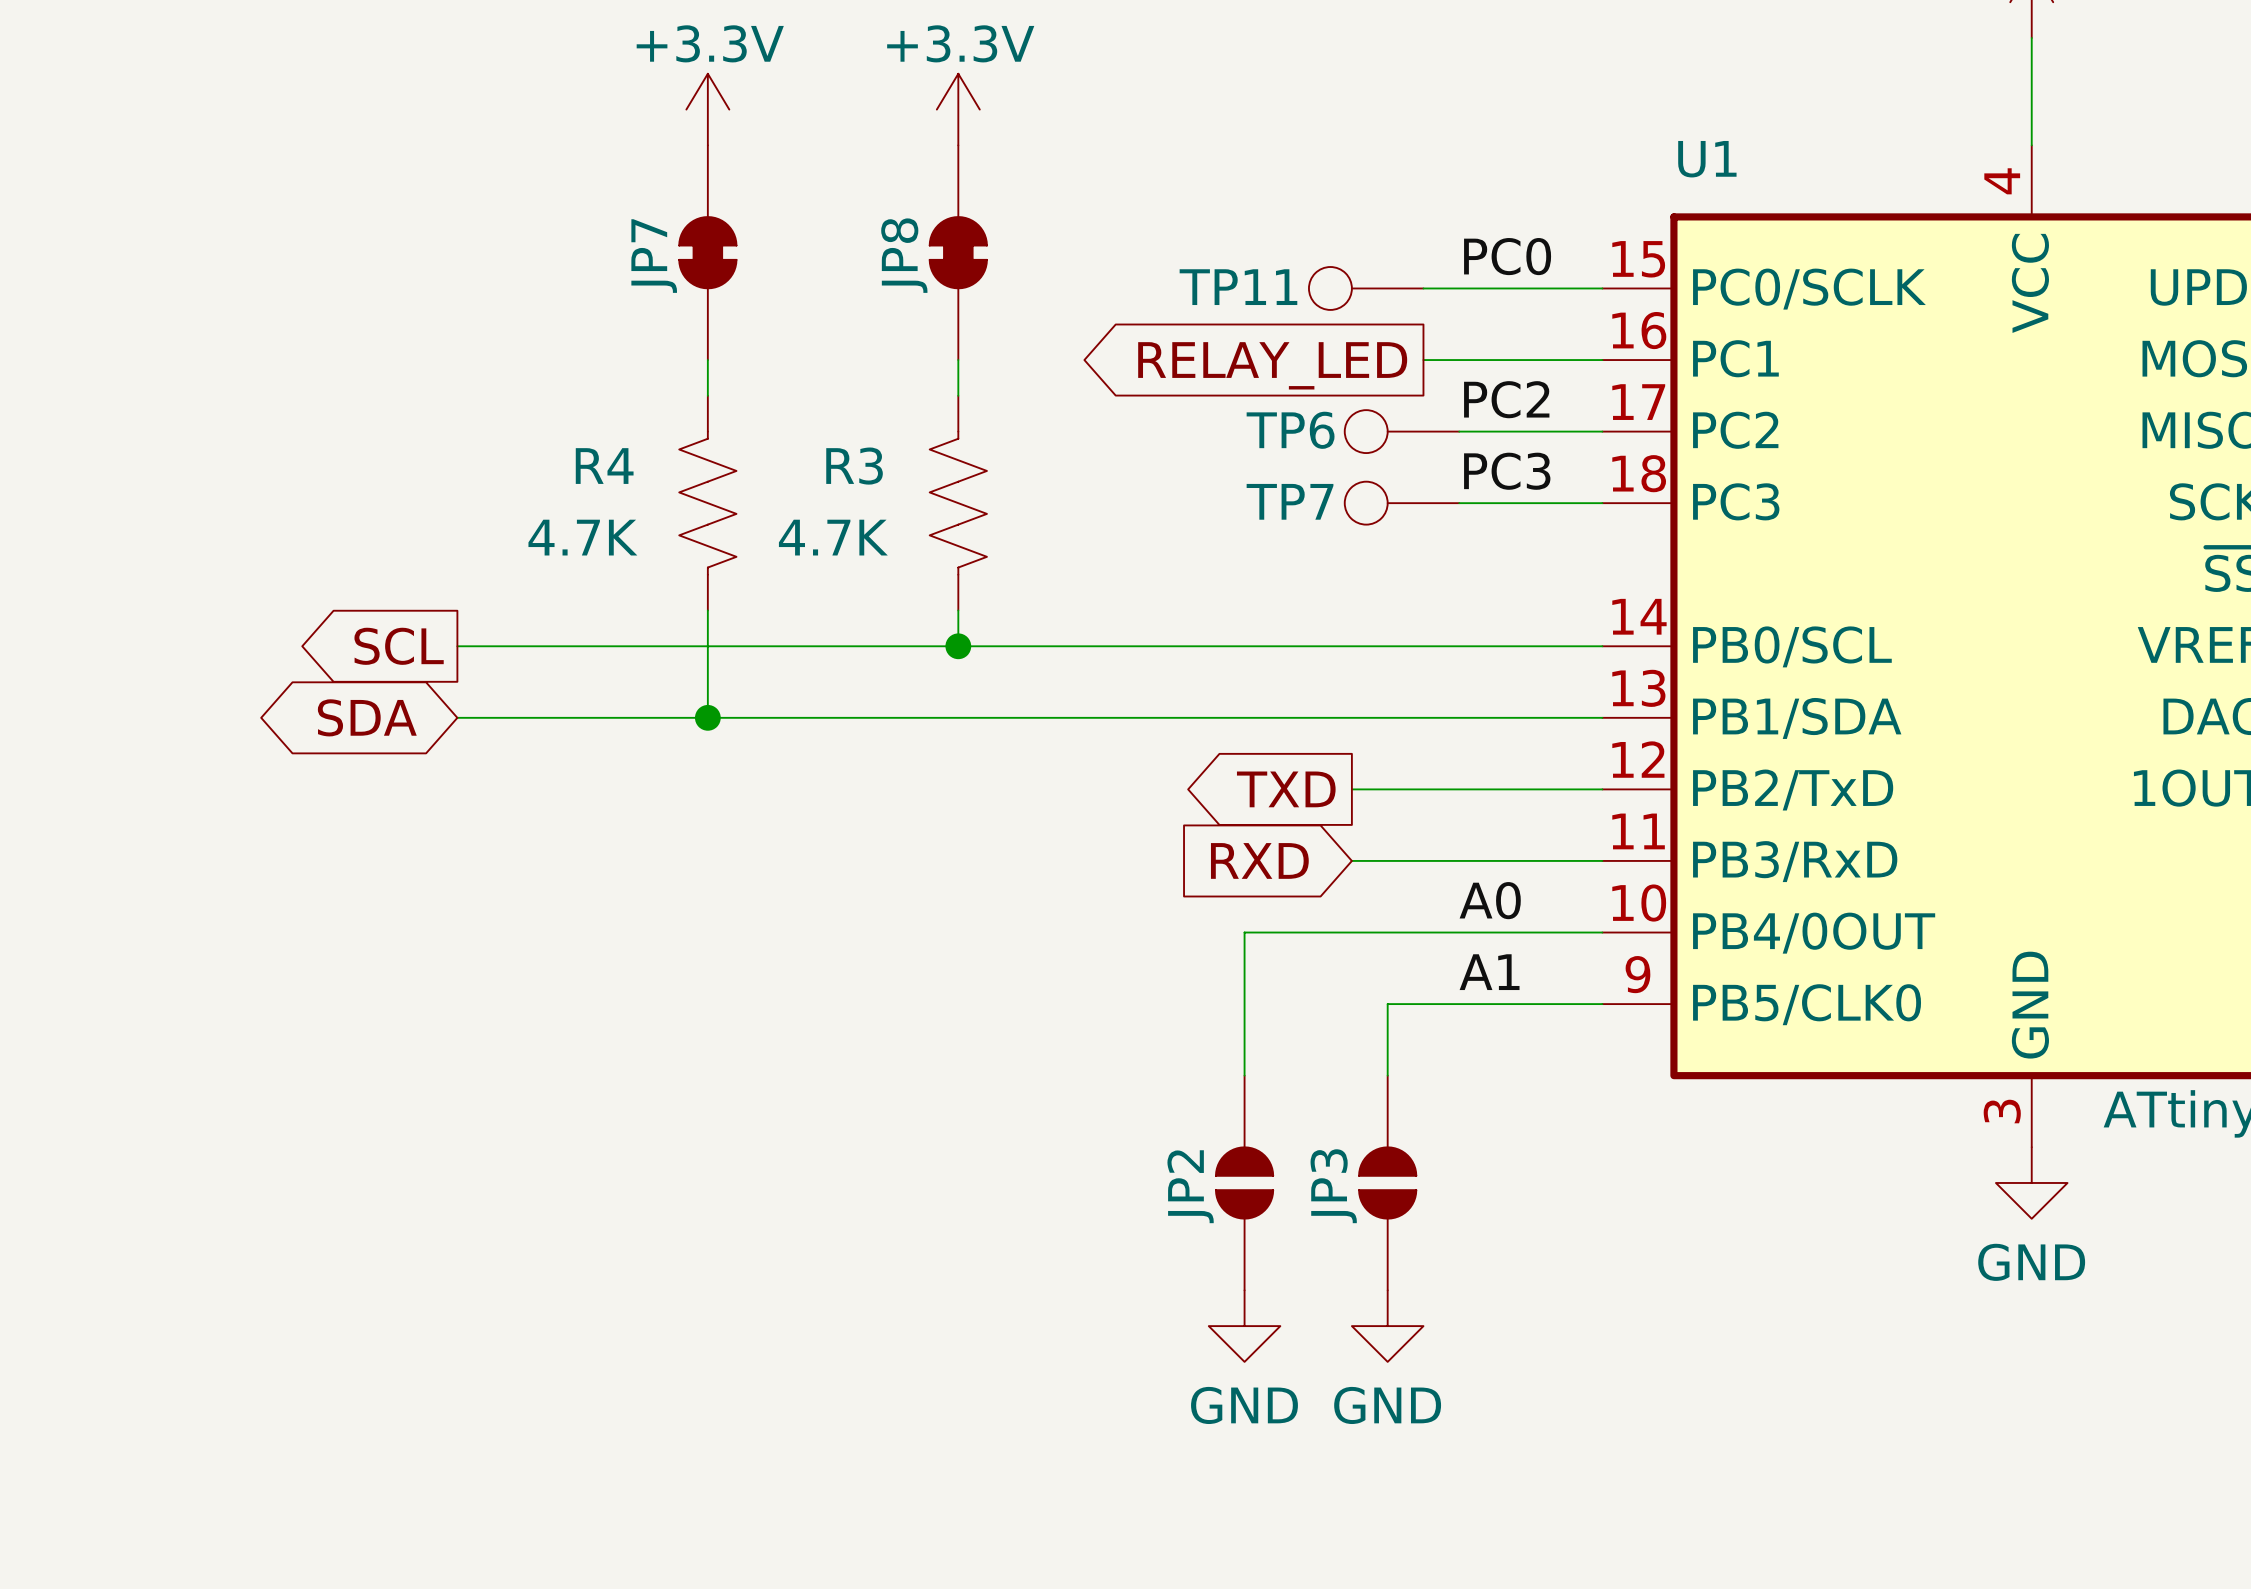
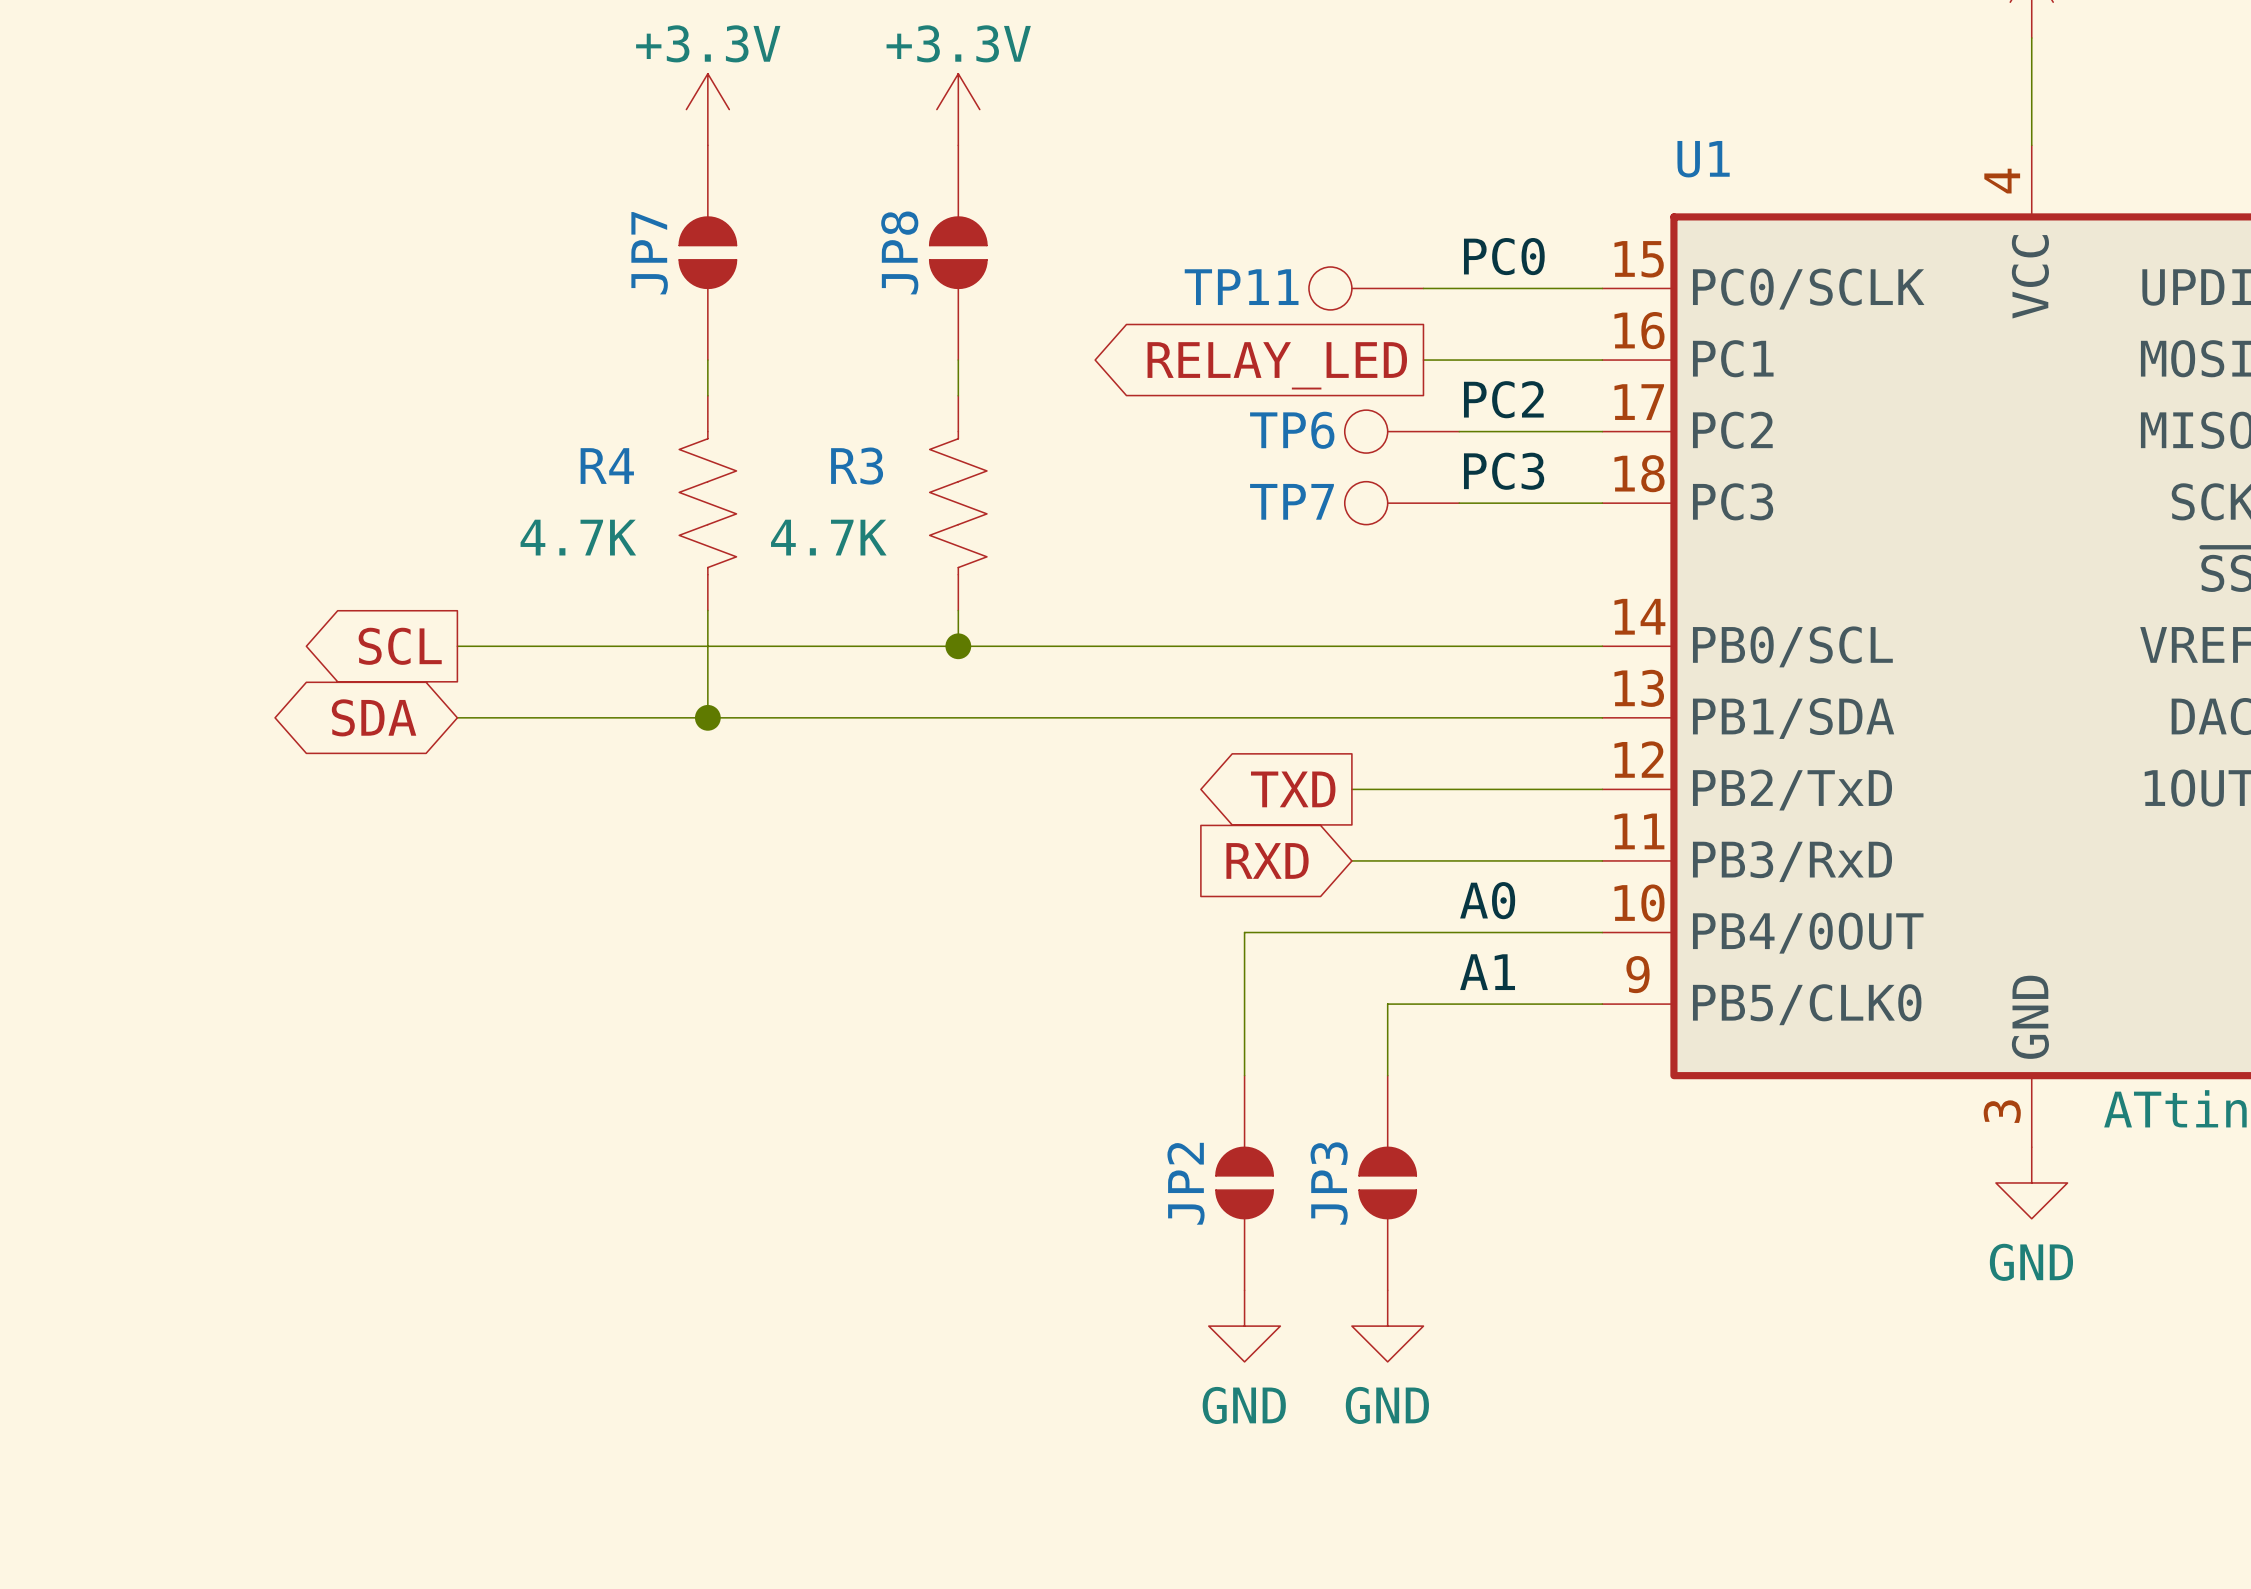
JP7 symbol: [679, 145, 737, 361] -> [679, 145, 737, 361]
JP8 symbol: [929, 145, 987, 361] -> [929, 145, 987, 361]

